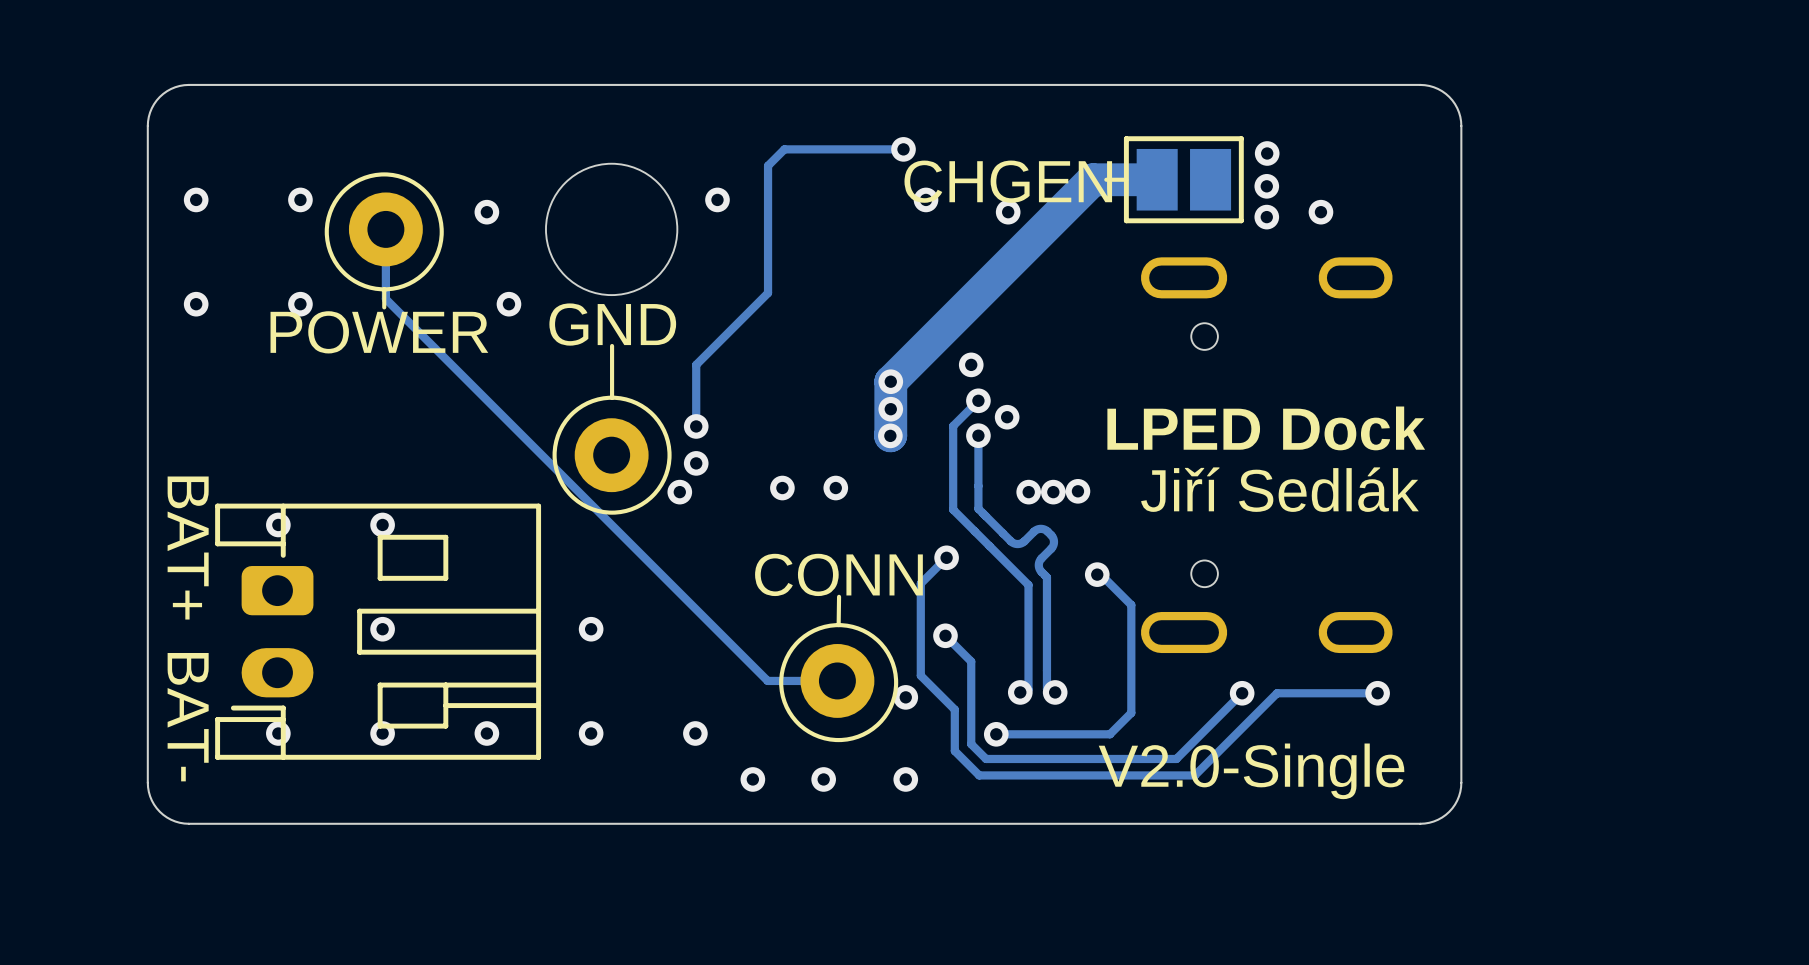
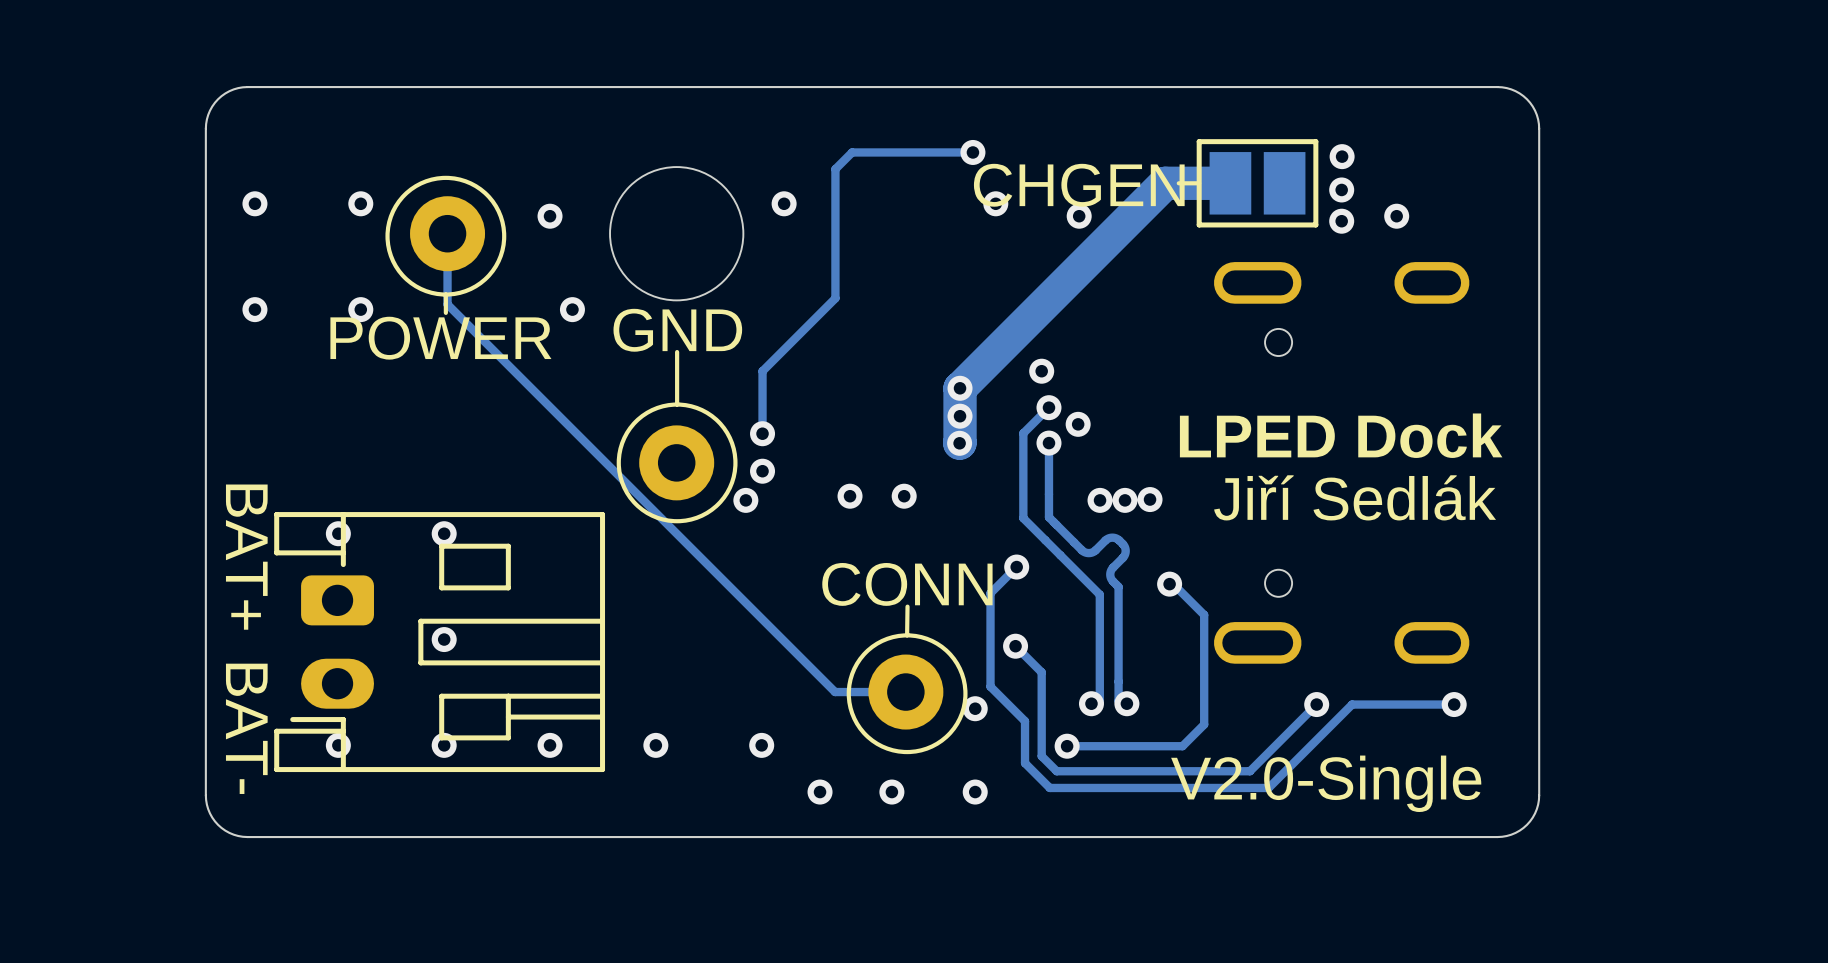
via: (591, 629) -> none

